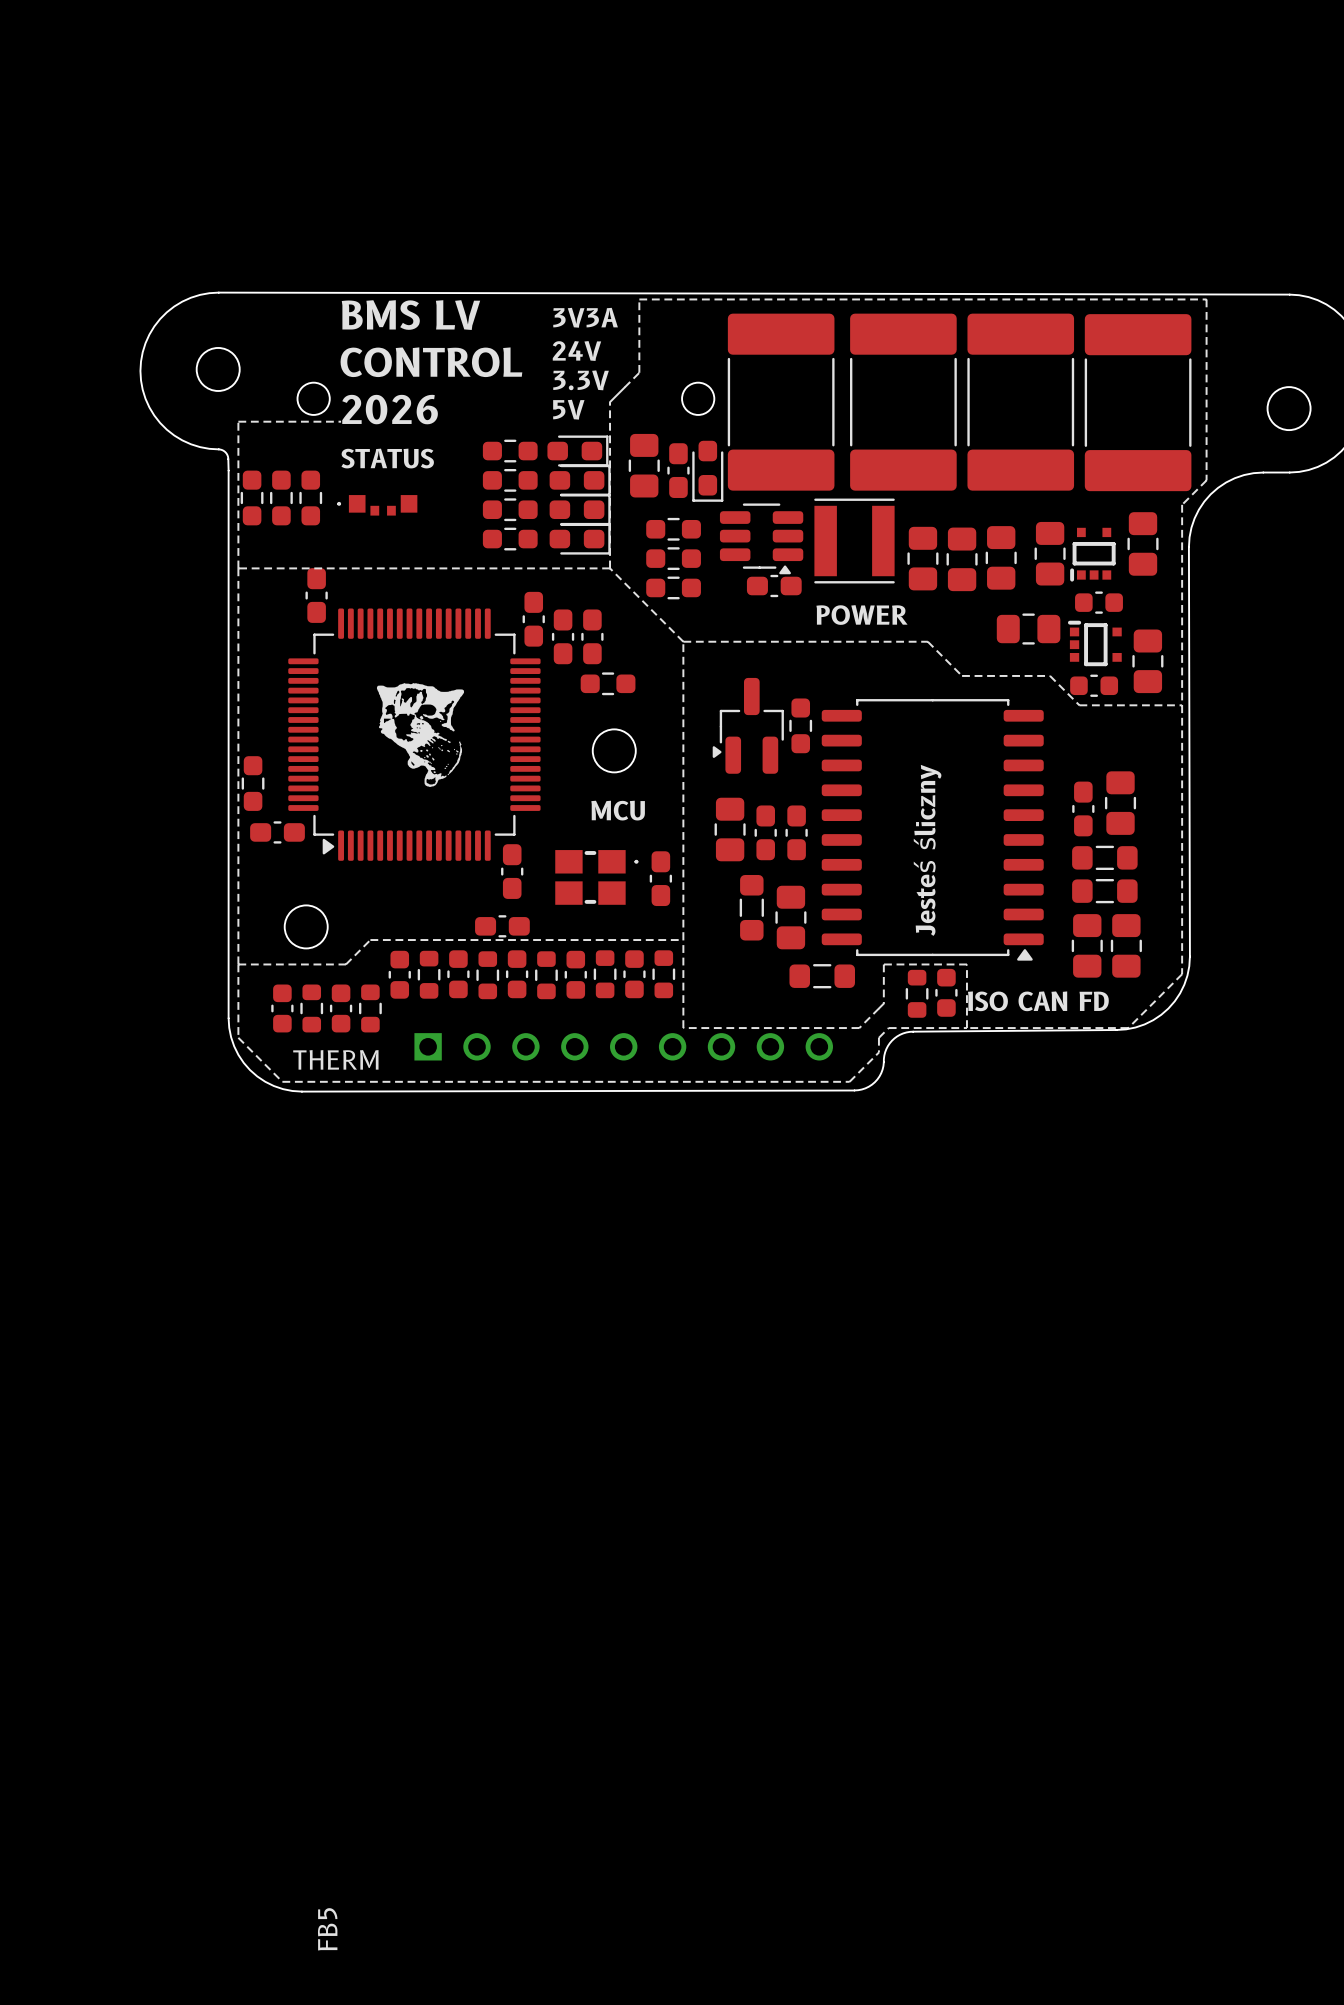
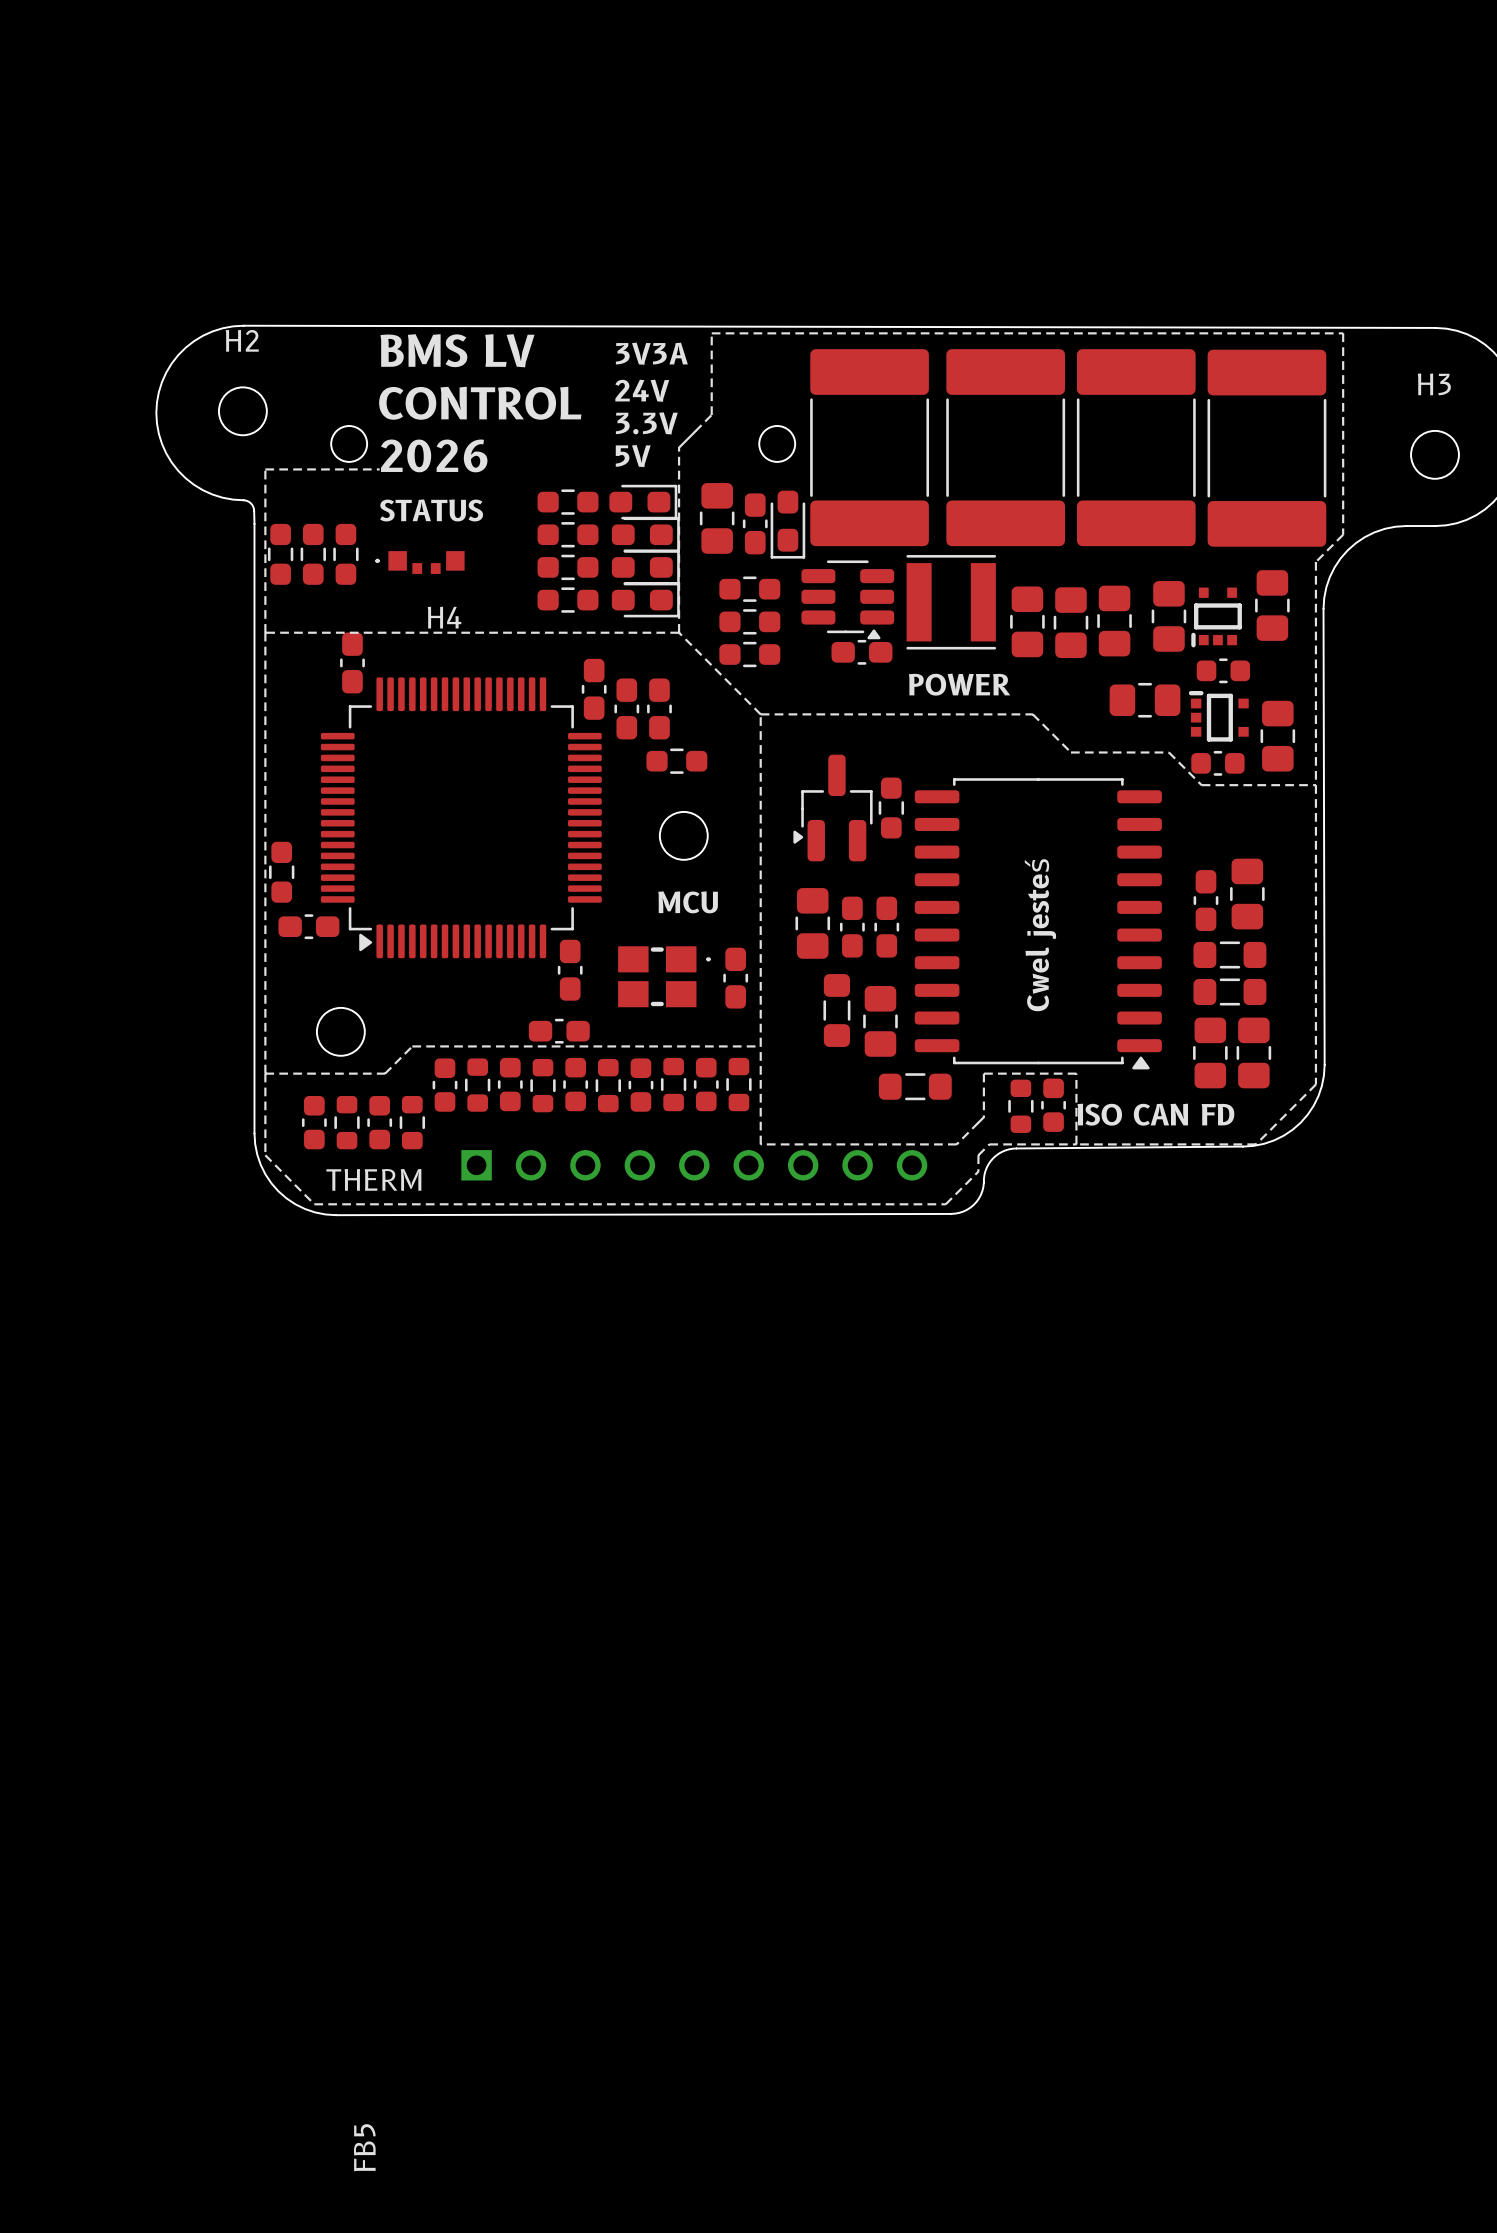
H2 name: none -> H2 (242, 340)
H3 name: none -> H3 (1434, 384)
H4 name: none -> H4 (444, 617)
drawing: [376, 683, 465, 787] -> none
text: none -> Cwel jesteś (1040, 935)
text: Jesteś śliczny (927, 850) -> none

